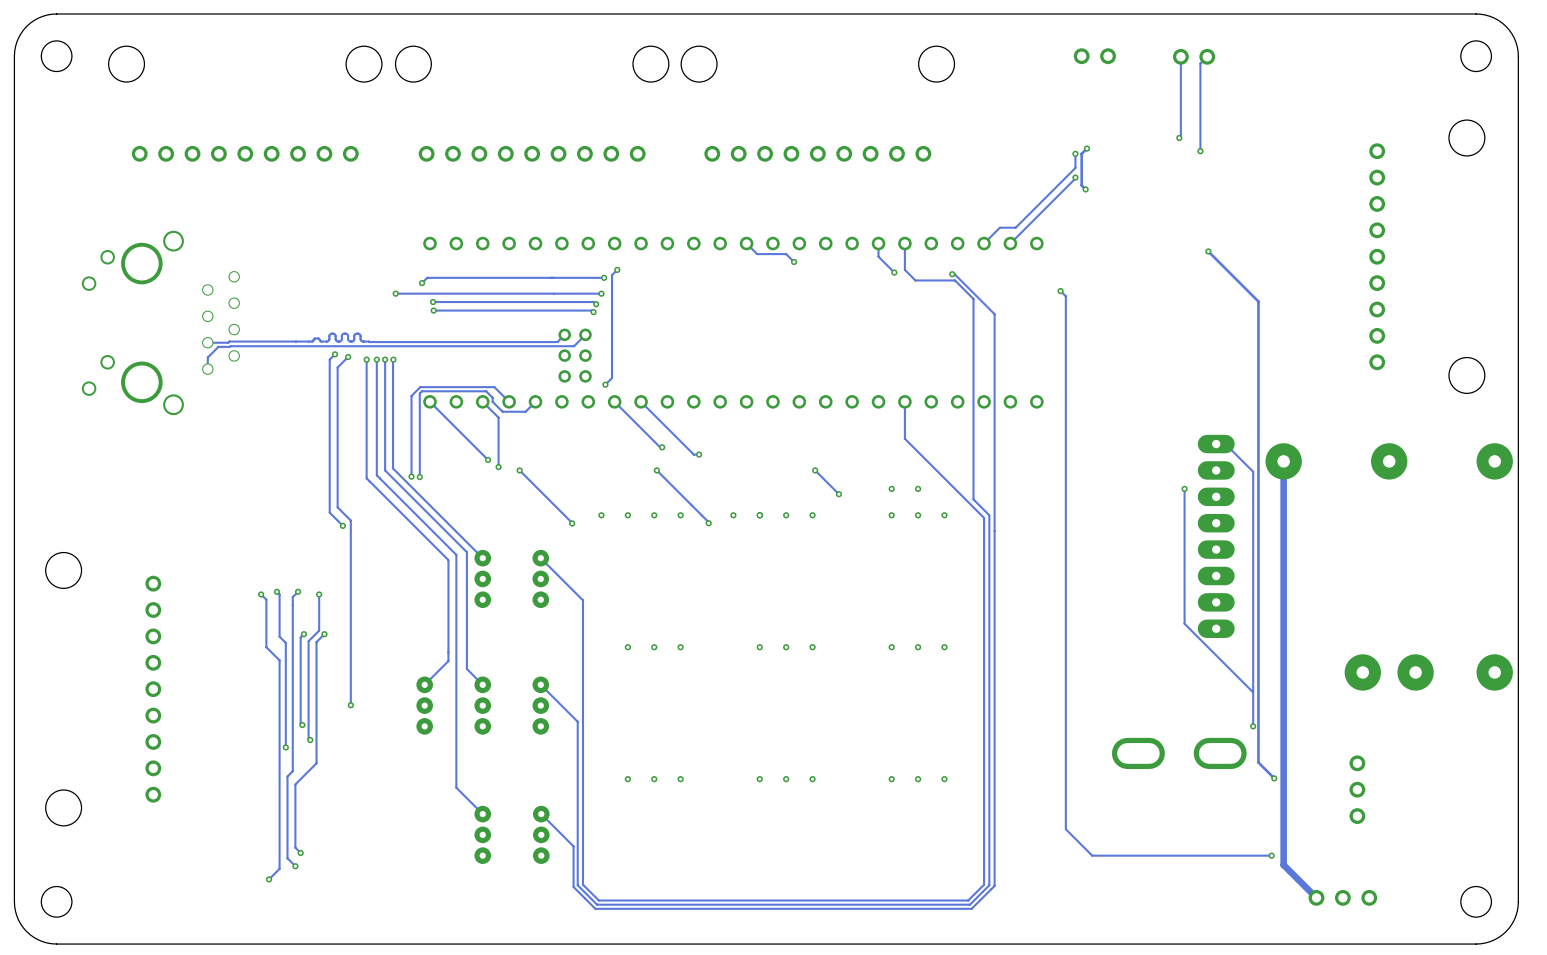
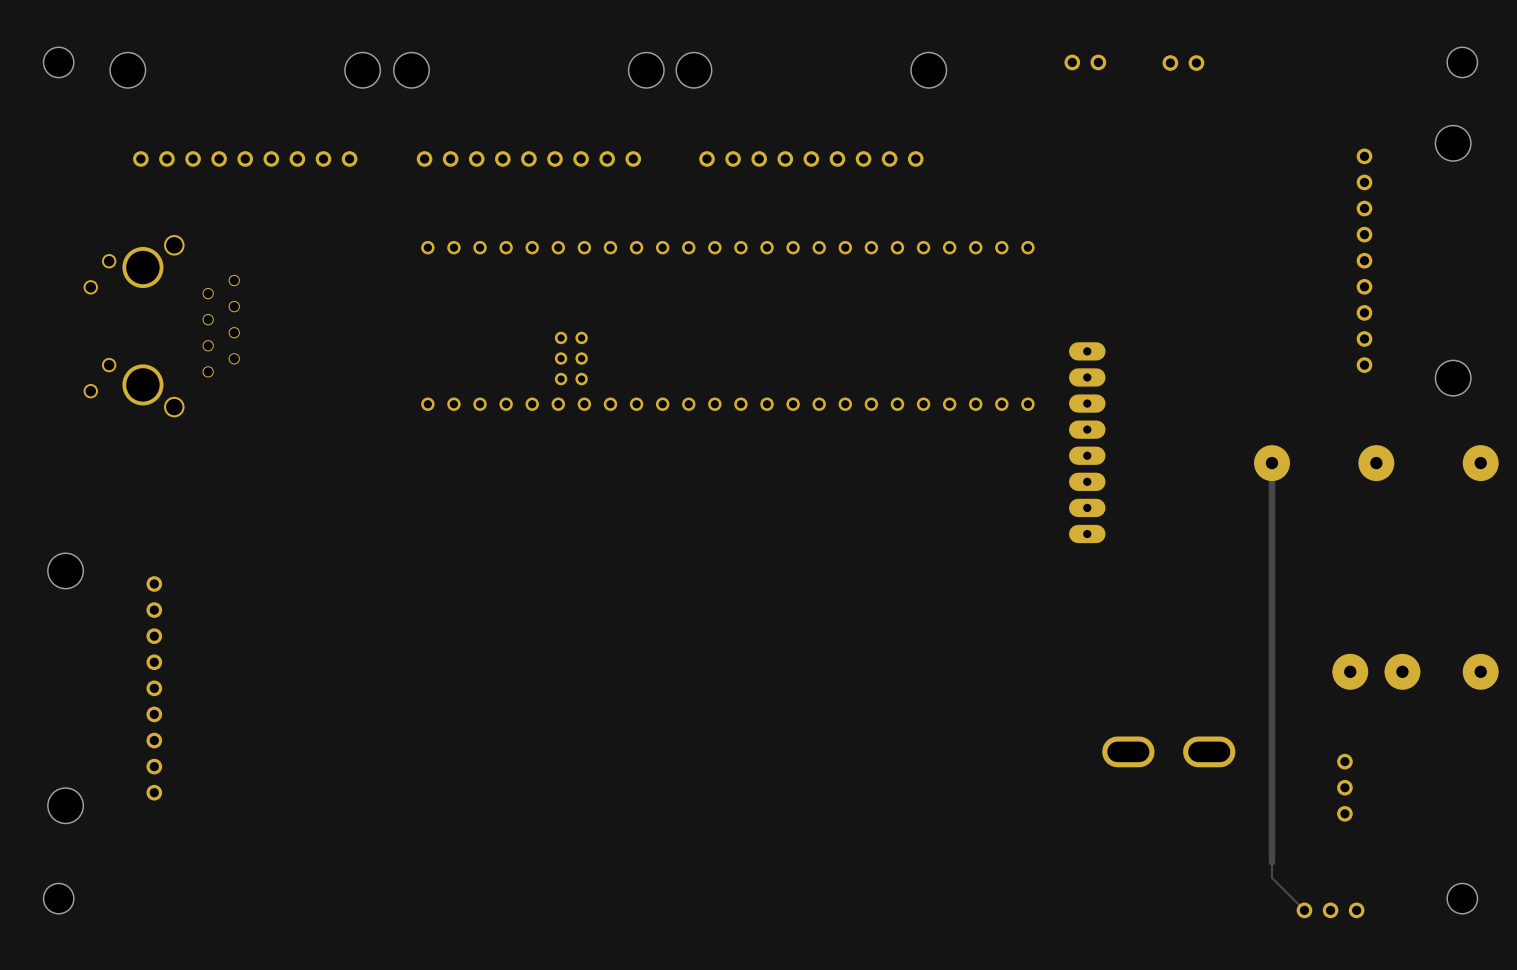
board edge: (1476, 13) (56, 13) (47, 15) (34, 20) (23, 29) (18, 37) (14, 56) (14, 901) (15, 911) (20, 924) (34, 937) (42, 941) (56, 944) (1476, 944) (1485, 942) (1498, 937) (1511, 924) (1515, 915) (1518, 901) (1518, 56) (1514, 37) (1505, 26) (1494, 18) (1476, 13) -> none
track: (1180, 56) (1180, 136) (1179, 137) -> none
track: (1207, 56) (1200, 63) (1200, 151) -> none
via: (1179, 137) -> none
track: (1086, 148) (1081, 153) (1081, 185) (1085, 189) -> none
via: (1086, 148) -> none
via: (1200, 151) -> none
track: (1075, 153) (1075, 167) (1015, 227) (999, 227) (984, 243) -> none
via: (1075, 153) -> none
track: (1075, 177) (1010, 243) -> none
via: (1075, 177) -> none
via: (1085, 189) -> none
track: (746, 243) (757, 254) (786, 254) (794, 262) -> none
track: (878, 243) (878, 256) (894, 272) -> none
track: (904, 243) (904, 269) (915, 280) (955, 280) (973, 298) (973, 499) (989, 515) (989, 885) (969, 904) (597, 904) (577, 885) (577, 721) (540, 684) -> none
track: (1208, 251) (1258, 301) (1258, 762) (1274, 778) -> none
via: (1208, 251) -> none
via: (794, 262) -> none
track: (617, 269) (612, 275) (612, 378) (605, 384) -> none
via: (617, 269) -> none
via: (894, 272) -> none
track: (952, 274) (954, 274) (994, 314) (994, 885) (971, 908) (595, 908) (573, 887) (573, 846) (541, 814) -> none
via: (952, 274) -> none
track: (604, 277) (427, 277) (422, 283) -> none
via: (604, 277) -> none
via: (422, 283) -> none
track: (1060, 291) (1065, 296) (1065, 829) (1092, 855) (1271, 855) -> none
via: (1060, 291) -> none
via: (395, 293) -> none
track: (601, 293) (395, 293) -> none
via: (601, 293) -> none
track: (433, 302) (594, 302) (596, 304) -> none
via: (433, 302) -> none
via: (596, 304) -> none
track: (433, 310) (591, 310) (593, 312) -> none
via: (433, 310) -> none
via: (593, 312) -> none
track: (564, 334) (557, 342) (369, 342) (361, 341) (358, 333) (354, 334) (351, 341) (348, 340) (347, 334) (343, 333) (341, 340) (338, 341) (335, 334) (331, 333) (327, 341) (315, 338) (312, 341) (207, 342) -> none
track: (585, 334) (574, 346) (218, 346) (207, 357) (207, 369) -> none
track: (334, 354) (329, 359) (329, 512) (342, 525) -> none
via: (334, 354) -> none
track: (348, 356) (337, 367) (337, 507) (350, 520) (350, 705) -> none
via: (348, 356) -> none
track: (366, 359) (366, 478) (448, 560) (448, 661) (424, 684) -> none
via: (366, 359) -> none
track: (376, 359) (376, 475) (456, 554) (456, 787) (482, 814) -> none
via: (376, 359) -> none
track: (385, 359) (385, 470) (466, 552) (466, 668) (482, 684) -> none
via: (385, 359) -> none
track: (393, 359) (393, 468) (482, 558) -> none
via: (393, 359) -> none
via: (605, 384) -> none
track: (429, 401) (488, 459) -> none
track: (482, 401) (498, 417) (498, 467) -> none
track: (509, 401) (494, 387) (420, 387) (411, 395) (411, 476) -> none
track: (535, 401) (525, 411) (502, 411) (492, 401) (492, 397) (486, 391) (422, 391) (419, 393) (419, 477) -> none
track: (614, 401) (662, 447) -> none
track: (641, 401) (693, 454) (699, 454) -> none
track: (904, 401) (904, 438) (984, 517) (984, 884) (968, 900) (598, 900) (583, 884) (583, 600) (540, 558) -> none
track: (1216, 444) (1225, 444) (1253, 471) (1253, 726) -> none
via: (662, 447) -> none
via: (699, 454) -> none
via: (488, 459) -> none
via: (498, 467) -> none
track: (519, 470) (572, 523) -> none
via: (519, 470) -> none
track: (656, 470) (708, 523) -> none
via: (656, 470) -> none
track: (815, 470) (838, 494) -> none
via: (815, 470) -> none
via: (411, 476) -> none
via: (419, 477) -> none
via: (891, 488) -> none
via: (918, 488) -> none
track: (1184, 488) (1184, 623) (1253, 692) -> none
via: (1184, 488) -> none
via: (838, 494) -> none
via: (601, 515) -> none
via: (627, 515) -> none
via: (654, 515) -> none
via: (680, 515) -> none
via: (733, 515) -> none
via: (759, 515) -> none
via: (786, 515) -> none
via: (812, 515) -> none
via: (891, 515) -> none
via: (918, 515) -> none
via: (944, 515) -> none
via: (572, 523) -> none
via: (708, 523) -> none
via: (342, 525) -> none
part position: (1216, 536) -> (1087, 442)
part: (482, 578) -> none
part: (540, 578) -> none
track: (276, 591) (279, 594) (279, 636) (285, 642) (285, 747) -> none
via: (276, 591) -> none
track: (298, 591) (292, 597) (292, 771) (287, 776) (287, 858) (295, 866) -> none
via: (298, 591) -> none
track: (261, 594) (266, 599) (266, 647) (279, 660) (279, 868) (269, 879) -> none
via: (261, 594) -> none
track: (319, 594) (319, 630) (308, 641) (308, 738) (310, 740) -> none
via: (319, 594) -> none
track: (303, 634) (300, 637) (300, 723) (302, 725) -> none
via: (303, 634) -> none
track: (324, 634) (316, 642) (316, 763) (295, 784) (295, 847) (300, 853) -> none
via: (324, 634) -> none
via: (627, 647) -> none
via: (654, 647) -> none
via: (680, 647) -> none
via: (759, 647) -> none
via: (786, 647) -> none
via: (812, 647) -> none
via: (891, 647) -> none
via: (918, 647) -> none
via: (944, 647) -> none
via: (350, 705) -> none
part: (424, 705) -> none
part: (482, 705) -> none
part: (540, 705) -> none
via: (302, 725) -> none
via: (1253, 726) -> none
via: (310, 740) -> none
via: (285, 747) -> none
via: (1274, 778) -> none
via: (627, 779) -> none
via: (654, 779) -> none
via: (680, 779) -> none
via: (759, 779) -> none
via: (786, 779) -> none
via: (812, 779) -> none
via: (891, 779) -> none
via: (918, 779) -> none
via: (944, 779) -> none
part: (482, 834) -> none
part: (541, 834) -> none
via: (300, 853) -> none
via: (1271, 855) -> none
track: (1283, 865) (1316, 897) -> (1271, 862) (1271, 877) (1304, 910)
via: (295, 866) -> none
via: (269, 879) -> none
part position: (1342, 897) -> (1330, 910)

